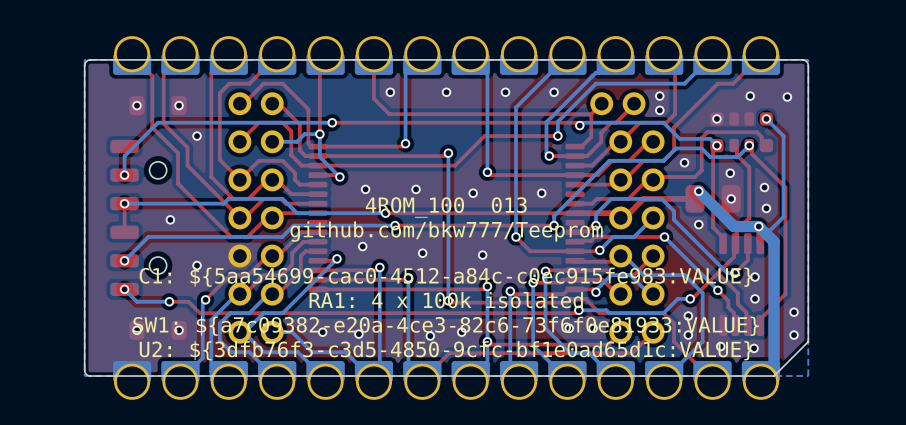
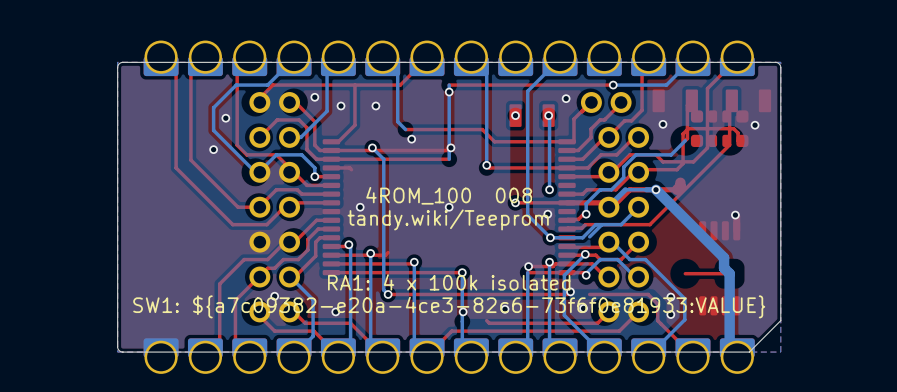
top track: (325, 54) (319, 59) (319, 134) -> none
top track: (140, 64) (152, 76) (152, 127) (177, 153) (177, 183) (231, 237) -> (168, 66) (176, 66) (176, 167) (232, 224) (252, 224)
top track: (164, 64) (163, 123) (187, 147) (187, 165) (239, 217) (244, 217) (263, 198) -> (190, 66) (190, 160) (238, 207) (258, 207) (276, 189) (281, 189)
top track: (220, 64) (211, 73) (211, 177) (233, 198) (248, 198) (267, 179) (277, 179) -> (241, 66) (237, 66) (237, 145) (246, 154) (276, 154) (293, 172)
top track: (277, 64) (268, 64) (249, 83) (229, 83) (219, 93) (219, 159) (239, 179) (258, 160) (282, 160) (295, 173) (295, 179) (299, 184) -> none
bottom track: none -> (294, 66) (286, 66) (267, 85) (236, 85) (213, 107) (213, 130) (255, 172) (258, 172) (276, 154) (301, 154) (314, 167) (314, 176)
top track: (373, 64) (373, 98) (389, 114) (591, 114) (591, 137) (581, 146) -> (590, 102) (573, 119) (573, 141)
bottom track: none -> (382, 66) (397, 66) (397, 121) (405, 129)
top track: none -> (427, 66) (418, 66) (400, 85) (272, 85) (255, 102)
bottom track: (422, 64) (405, 64) (405, 143) -> none
bottom track: (615, 64) (607, 72) (595, 72) (546, 122) (546, 153) (549, 156) -> none
top track: (664, 64) (675, 64) (675, 114) (666, 122) (639, 122) (619, 141) -> (648, 66) (642, 73) (642, 110) (631, 120) (624, 120) (608, 137)
bottom track: (684, 83) (595, 83) (557, 121) (557, 136) -> (667, 84) (613, 85)
top track: (733, 83) (717, 83) (674, 127) (674, 150) (663, 160) -> (711, 84) (707, 88) (707, 147) (693, 161) (662, 161) (656, 154) (648, 154)
bottom track: none -> (449, 85) (449, 159)
top track: none -> (613, 85) (449, 85)
via: none -> (613, 85)
bottom track: (532, 91) (516, 107) (516, 237) -> (527, 91) (527, 215) (550, 237) (582, 237) (595, 224) (601, 224)
via: (390, 92) -> none
via: (505, 92) -> none
via: (554, 92) -> none
via: (659, 96) -> none
via: (750, 96) -> none
via: none -> (314, 97)
via: (787, 97) -> none
via: none -> (566, 98)
part: none -> (675, 100)
top track: none -> (691, 100) (687, 105) (687, 138) (685, 140)
top track: none -> (731, 100) (729, 103) (729, 144) (649, 224)
part: none -> (748, 100)
top track: (239, 103) (243, 103) (263, 83) (282, 83) (308, 109) (308, 143) (311, 146) (317, 146) -> none
via: (136, 105) -> none
via: (179, 105) -> none
via: none -> (341, 106)
via: none -> (375, 106)
via: (659, 110) -> none
via: none -> (515, 115)
part: none -> (532, 115)
bottom track: none -> (548, 115) (549, 189)
via: none -> (548, 115)
via: (716, 118) -> none
bottom track: (766, 118) (783, 136) (783, 217) (766, 234) -> none
via: (766, 118) -> none
via: none -> (225, 118)
top track: (332, 122) (576, 122) (579, 125) -> none
bottom track: (332, 122) (158, 122) (124, 156) (124, 175) -> none
via: (332, 122) -> none
bottom track: (579, 125) (582, 122) (663, 122) (679, 138) (710, 138) (716, 145) -> none
via: (579, 125) -> none
via: none -> (662, 124)
via: none -> (755, 125)
top track: none -> (405, 129) (482, 129) (494, 141) (567, 141)
via: (319, 134) -> none
via: (197, 136) -> none
top track: (557, 136) (484, 136) (455, 165) (446, 165) -> none
via: (557, 136) -> none
bottom track: (284, 141) (297, 141) (304, 134) (319, 134) (319, 157) (339, 177) -> (300, 137) (327, 111) (327, 66) (338, 66)
top track: (405, 143) (402, 146) (325, 146) -> (354, 85) (354, 125) (338, 141)
top track: (716, 145) (713, 149) (713, 227) (723, 237) (723, 243) -> none
via: (716, 145) -> none
top track: (734, 145) (736, 148) (736, 155) (749, 167) (749, 217) (736, 230) (734, 257) (690, 298) -> none
top track: (749, 145) (752, 148) (752, 154) (785, 187) (785, 294) (760, 319) (760, 325) -> none
bottom track: (749, 145) (737, 157) (710, 157) (701, 148) (675, 148) (663, 160) -> (685, 140) (671, 154) (648, 154)
via: (749, 145) -> none
bottom track: none -> (372, 147) (383, 159) (383, 290) (388, 294)
via: none -> (372, 147)
bottom track: (448, 153) (448, 300) -> none
via: none -> (213, 149)
via: (549, 156) -> none
top track: (575, 156) (549, 156) -> none
bottom track: (650, 160) (609, 160) (554, 216) (554, 225) -> (635, 154) (623, 167) (623, 177) (611, 189)
via: (684, 162) -> none
via: (730, 173) -> none
via: (124, 175) -> none
via: (339, 177) -> none
via: none -> (314, 176)
via: (764, 187) -> none
via: (365, 189) -> none
via: (416, 189) -> none
bottom track: (698, 191) (734, 226) (758, 226) (774, 241) (774, 371) (760, 371) -> (646, 189) (656, 189) (724, 257) (724, 268) (729, 273) (729, 347) (737, 347)
via: (698, 191) -> none
via: (473, 193) -> none
via: (541, 193) -> none
via: none -> (549, 189)
bottom track: (638, 198) (623, 198) -> (625, 189) (608, 207)
bottom track: (661, 198) (674, 211) (674, 219) (727, 273) (735, 273) -> none
via: none -> (656, 189)
part: (713, 198) -> none
via: (731, 198) -> none
top track: (124, 203) (124, 232) -> none
bottom track: (124, 203) (223, 203) (228, 198) (282, 198) (297, 213) (385, 213) -> none
via: (124, 203) -> none
text: 4ROM_100 013 (446, 207) -> 4ROM_100 008 (449, 195)
via: (766, 208) -> none
via: (385, 213) -> none
top track: (518, 213) (385, 213) -> none
via: none -> (515, 202)
part: (148, 217) -> none
via: none -> (360, 207)
via: none -> (449, 207)
via: (170, 219) -> none
via: (698, 224) -> none
bottom track: (395, 225) (293, 225) (282, 237) (148, 237) (124, 260) -> none
via: (395, 225) -> none
top track: (554, 225) (395, 225) -> none
text: github.com/bkw777/Teeprom (446, 231) -> tandy.wiki/Teeprom (448, 219)
top track: (516, 237) (530, 251) (556, 251) -> none
via: (516, 237) -> none
bottom track: (664, 237) (717, 290) -> none
via: (664, 237) -> none
top track: (747, 243) (747, 260) (735, 273) -> none
via: (362, 246) -> none
top track: (599, 250) (575, 251) -> none
via position: (599, 250) -> (585, 254)
via: none -> (550, 237)
via: (422, 253) -> none
via: (482, 255) -> none
bottom track: (337, 258) (282, 313) (263, 313) (244, 332) -> (348, 244) (350, 246) (350, 347) (338, 347)
via: (124, 260) -> none
via: (197, 265) -> none
bottom track: (379, 267) (379, 365) (373, 371) -> none
via: (379, 267) -> none
via: none -> (370, 253)
top track: (575, 270) (545, 271) -> none
bottom track: (545, 271) (545, 328) (570, 353) (589, 353) -> (585, 254) (564, 275) (564, 315) (580, 331)
via: (545, 271) -> none
top track: (717, 273) (737, 293) (737, 304) (746, 312) (747, 325) -> none
via: (735, 273) -> none
top track: (230, 275) (205, 299) -> (251, 259) (244, 259) (219, 284) (219, 347) (205, 347)
top track: (265, 275) (244, 294) (239, 294) -> (283, 259) (274, 268) (267, 268) (235, 300) (235, 347) (249, 347)
bottom track: (660, 275) (684, 275) (702, 293) (702, 341) -> (645, 259) (684, 298) (683, 320)
text: C1: ${5aa54699-cac0-4512-a84c-c0ec915fe983:VALUE} (446, 277) -> none
via: none -> (549, 262)
via: (755, 277) -> none
bottom track: (533, 282) (533, 345) (559, 371) -> (549, 262) (549, 347) (552, 347)
top track: (487, 286) (484, 289) (460, 289) -> none
bottom track: (487, 286) (487, 371) (470, 371) -> (462, 272) (462, 347) (471, 347)
via: (487, 286) -> none
bottom track: (124, 289) (136, 301) (169, 301) -> none
via: (124, 289) -> none
via: none -> (462, 272)
top track: (568, 289) (563, 294) (513, 294) (510, 291) -> (560, 272) (527, 272)
top track: (717, 290) (728, 300) (728, 307) (734, 313) (735, 325) -> none
via: (717, 290) -> none
top track: none -> (729, 273) (685, 273)
bottom track: (510, 291) (510, 362) (519, 371) -> (527, 272) (527, 347) (515, 347)
via: (510, 291) -> none
bottom track: (239, 294) (237, 294) (211, 319) (211, 371) (228, 371) -> none
bottom track: (272, 294) (268, 294) (249, 313) (230, 313) (219, 323) (219, 340) (231, 352) (249, 352) (268, 371) (277, 371) -> (290, 277) (313, 299) (313, 336) (301, 347) (294, 347)
bottom track: (690, 298) (677, 298) (663, 313) (609, 313) (606, 310) (578, 310) -> none
via: (690, 298) -> none
via: (755, 298) -> none
bottom track: (205, 299) (202, 302) (202, 357) (189, 371) (180, 371) -> none
via: (205, 299) -> none
top track: (448, 300) (450, 302) (567, 302) (571, 298) (585, 298) (599, 313) -> none
via: (448, 300) -> none
top track: (169, 301) (188, 301) (199, 313) (379, 313) -> none
via: (169, 301) -> none
via: (794, 312) -> none
via: none -> (388, 294)
via: none -> (274, 296)
via: (569, 328) -> none
via: none -> (505, 309)
via: (136, 330) -> none
via: (179, 330) -> none
top track: none -> (255, 311) (274, 331) (313, 331) (330, 347) (338, 347)
bottom track: (244, 332) (263, 352) (297, 352) (317, 371) (325, 371) -> none
bottom track: (272, 332) (292, 332) (312, 352) (345, 352) (364, 371) -> (370, 253) (370, 347) (374, 347)
top track: none -> (293, 311) (305, 323) (350, 323) (375, 347) (382, 347)
via: (358, 334) -> none
via: (794, 335) -> none
via: (430, 336) -> none
via: (487, 341) -> none
via: (720, 346) -> none
via: (754, 348) -> none
text: U2: ${3dfb76f3-c3d5-4850-9cfc-bf1e0ad65d1c:VALUE} (446, 350) -> none

